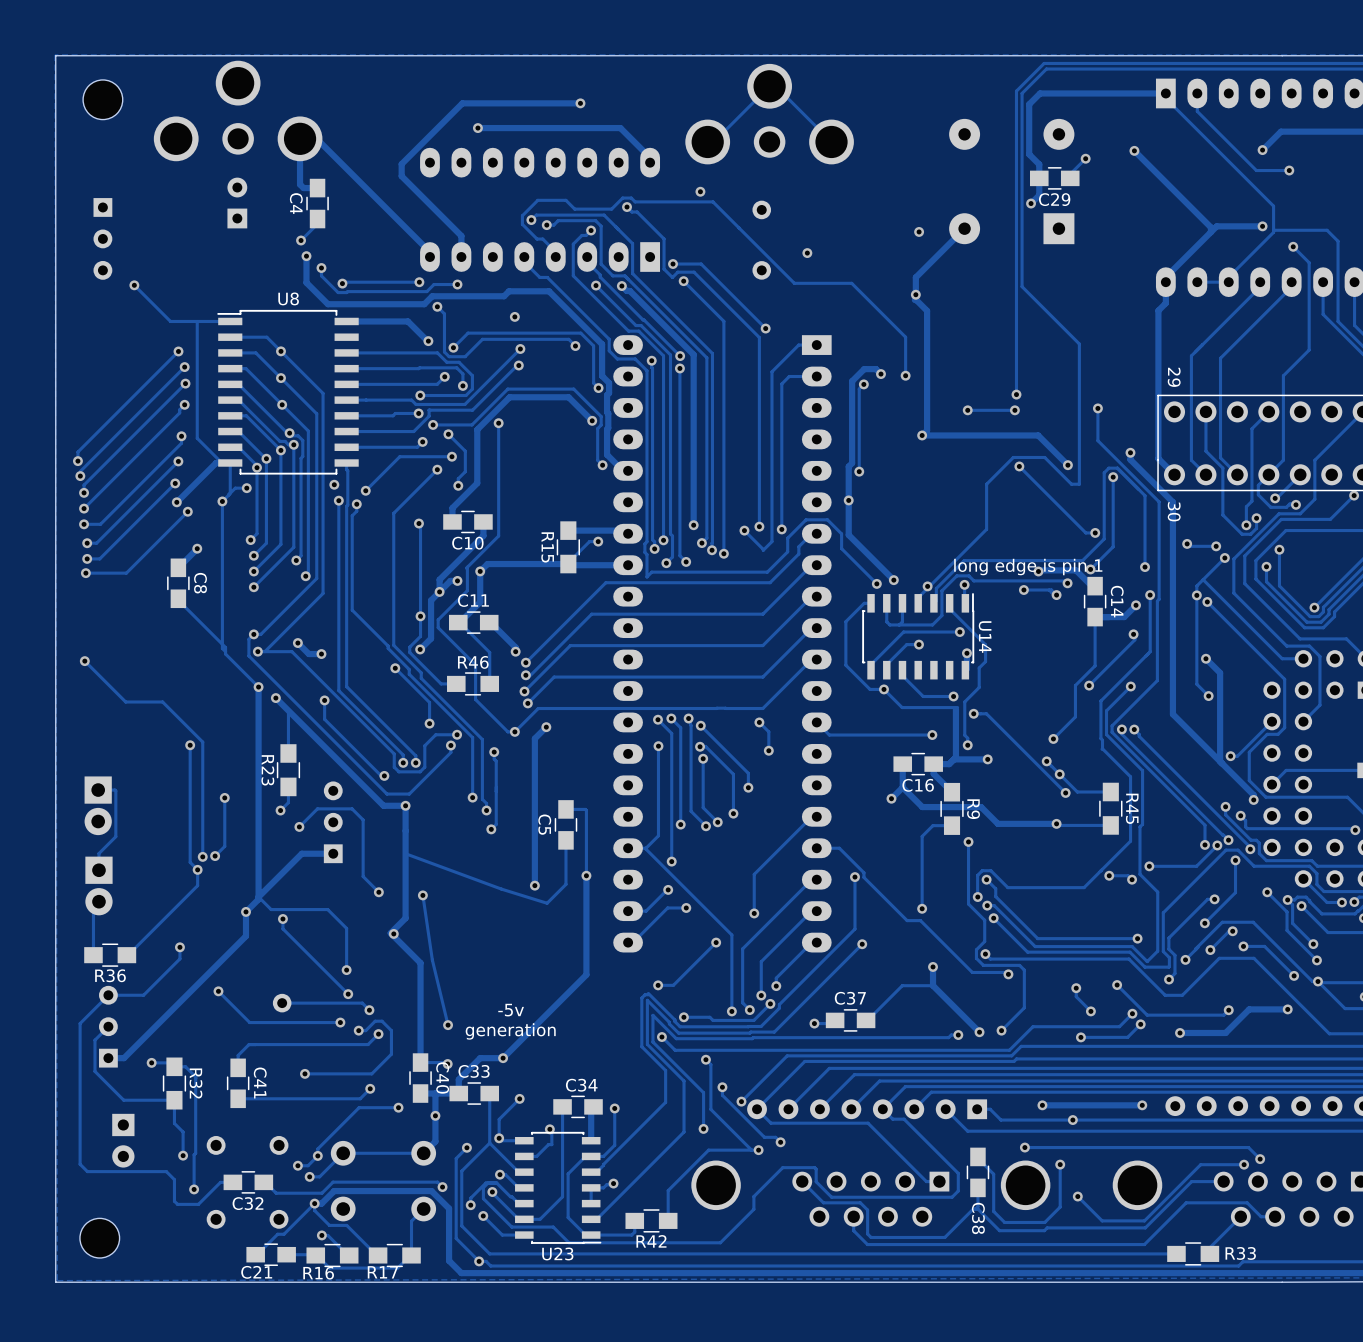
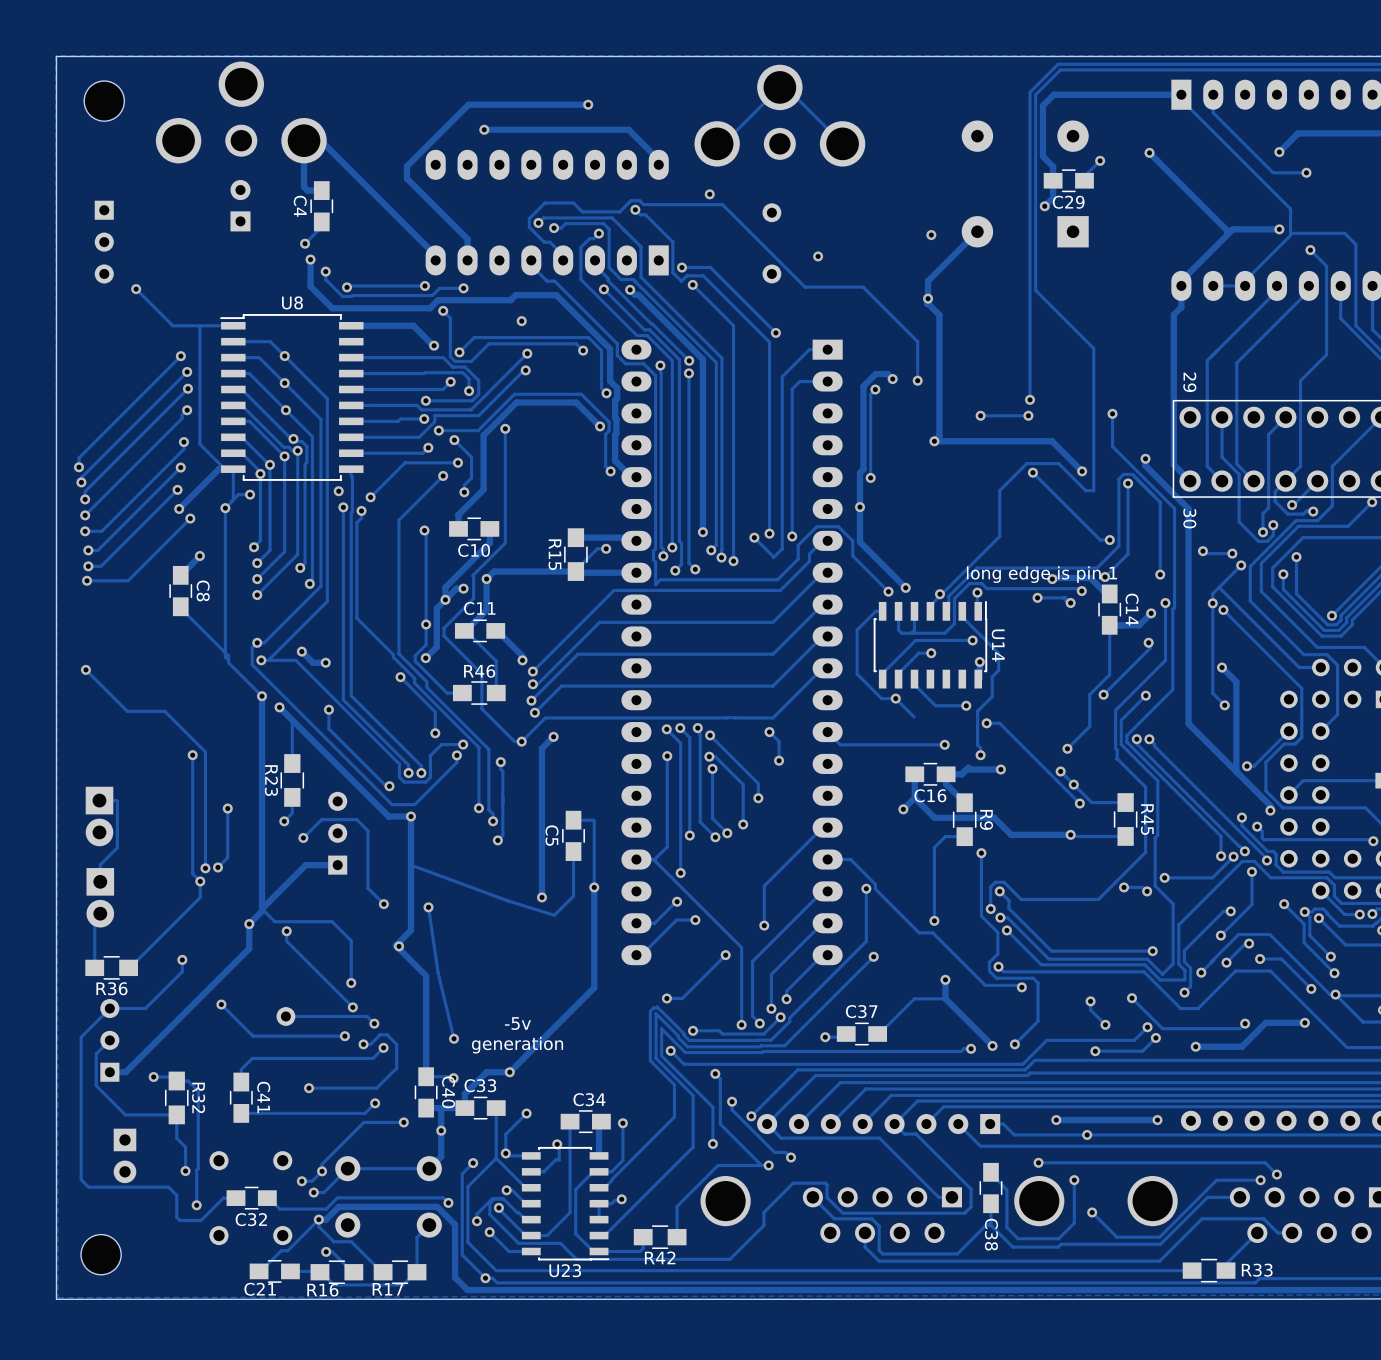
track: (957, 707) (902, 707) -> none
track: (955, 709) (955, 757) -> none

